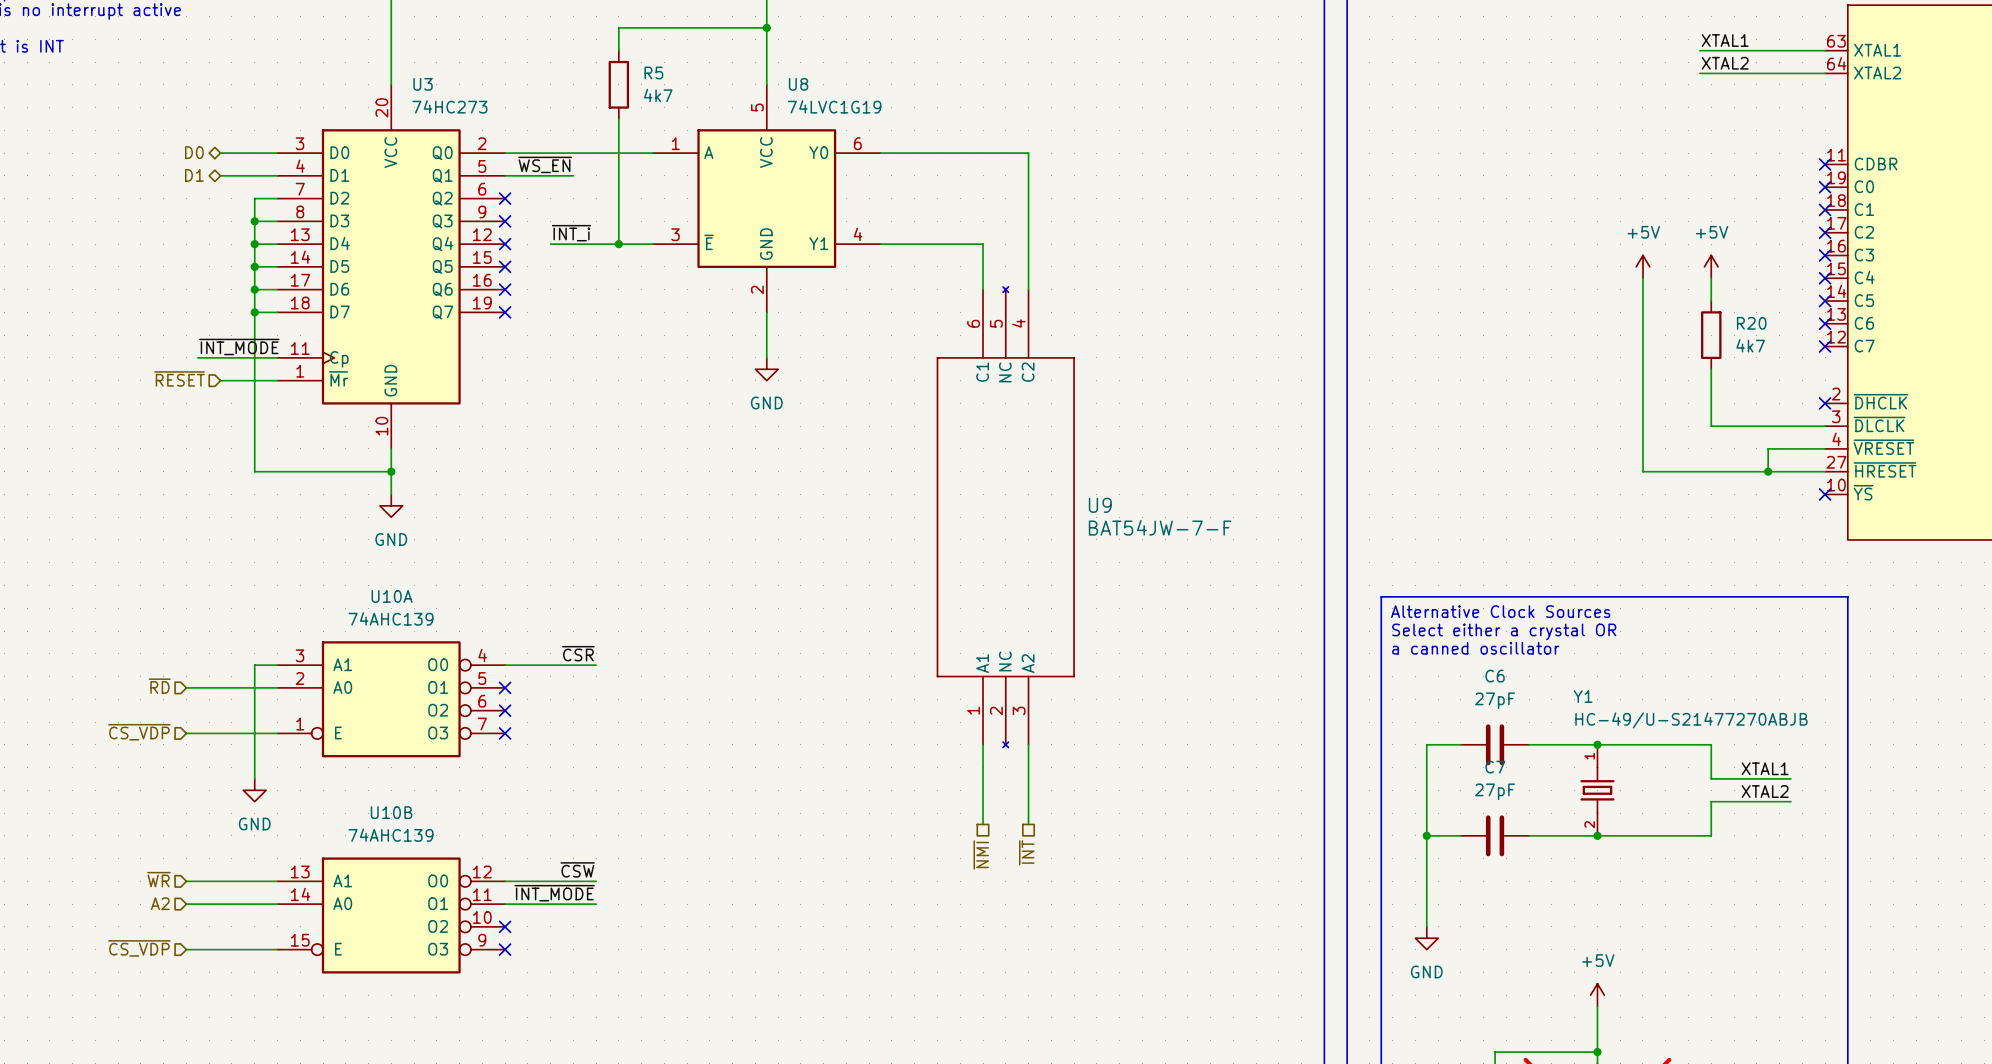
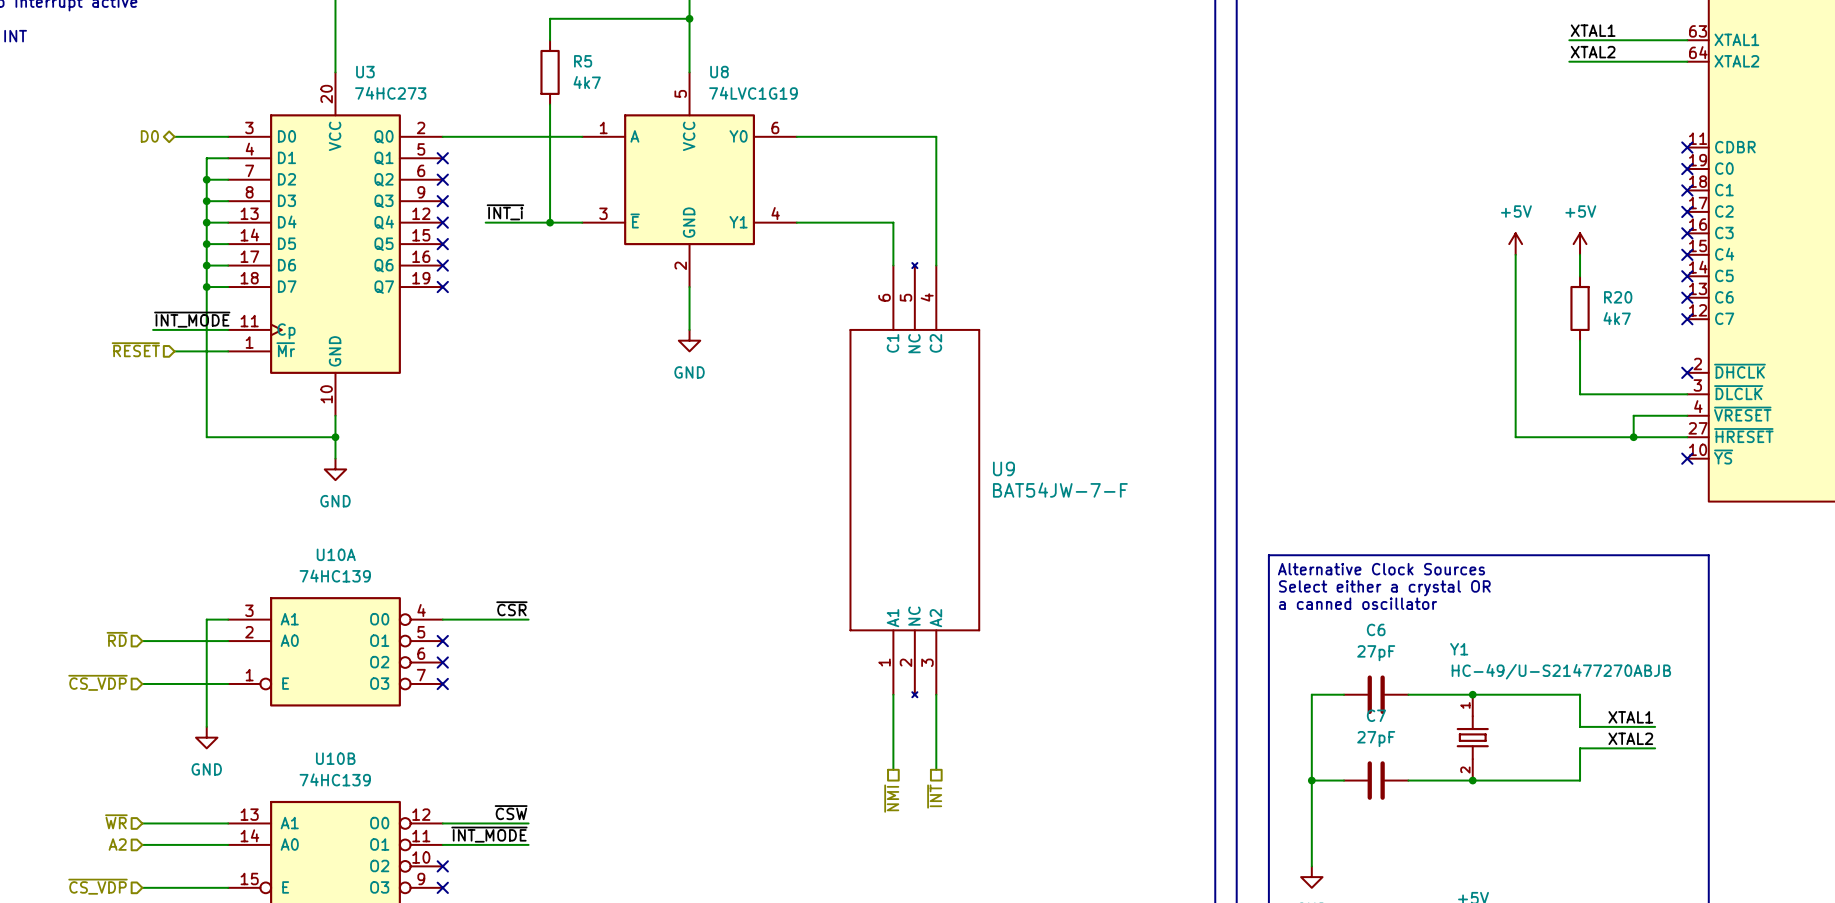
label: ~{WS_EN} (545, 164) -> none
hierarchical label: D1 (194, 175) -> none
wire: (220, 175) (254, 175) -> (206, 179) (206, 158)
wire: (505, 175) (573, 175) -> none
no-connect mark: none -> (442, 158)
junction: none -> (206, 179)
U10A value: 74AHC139 (391, 618) -> 74HC139 (335, 576)
U10B value: 74AHC139 (391, 835) -> 74HC139 (335, 779)

